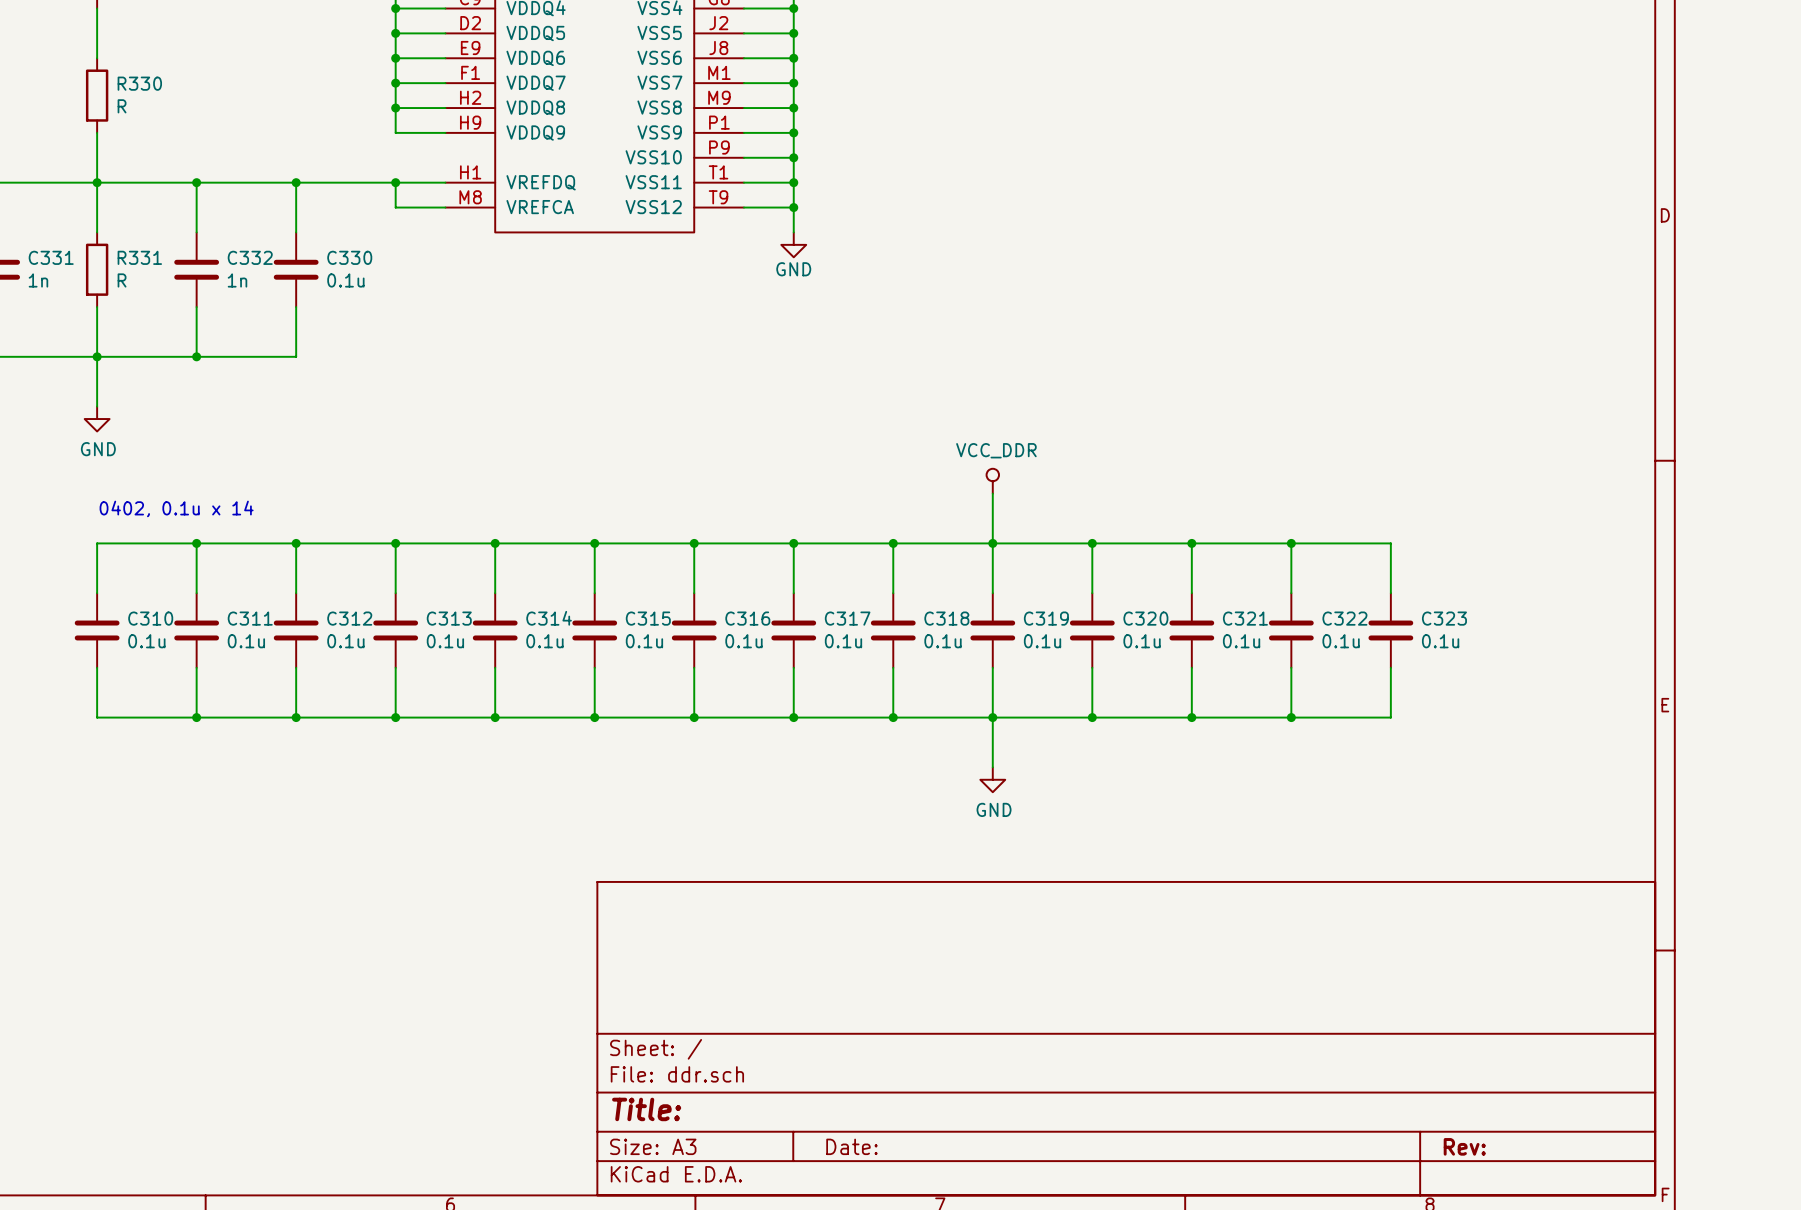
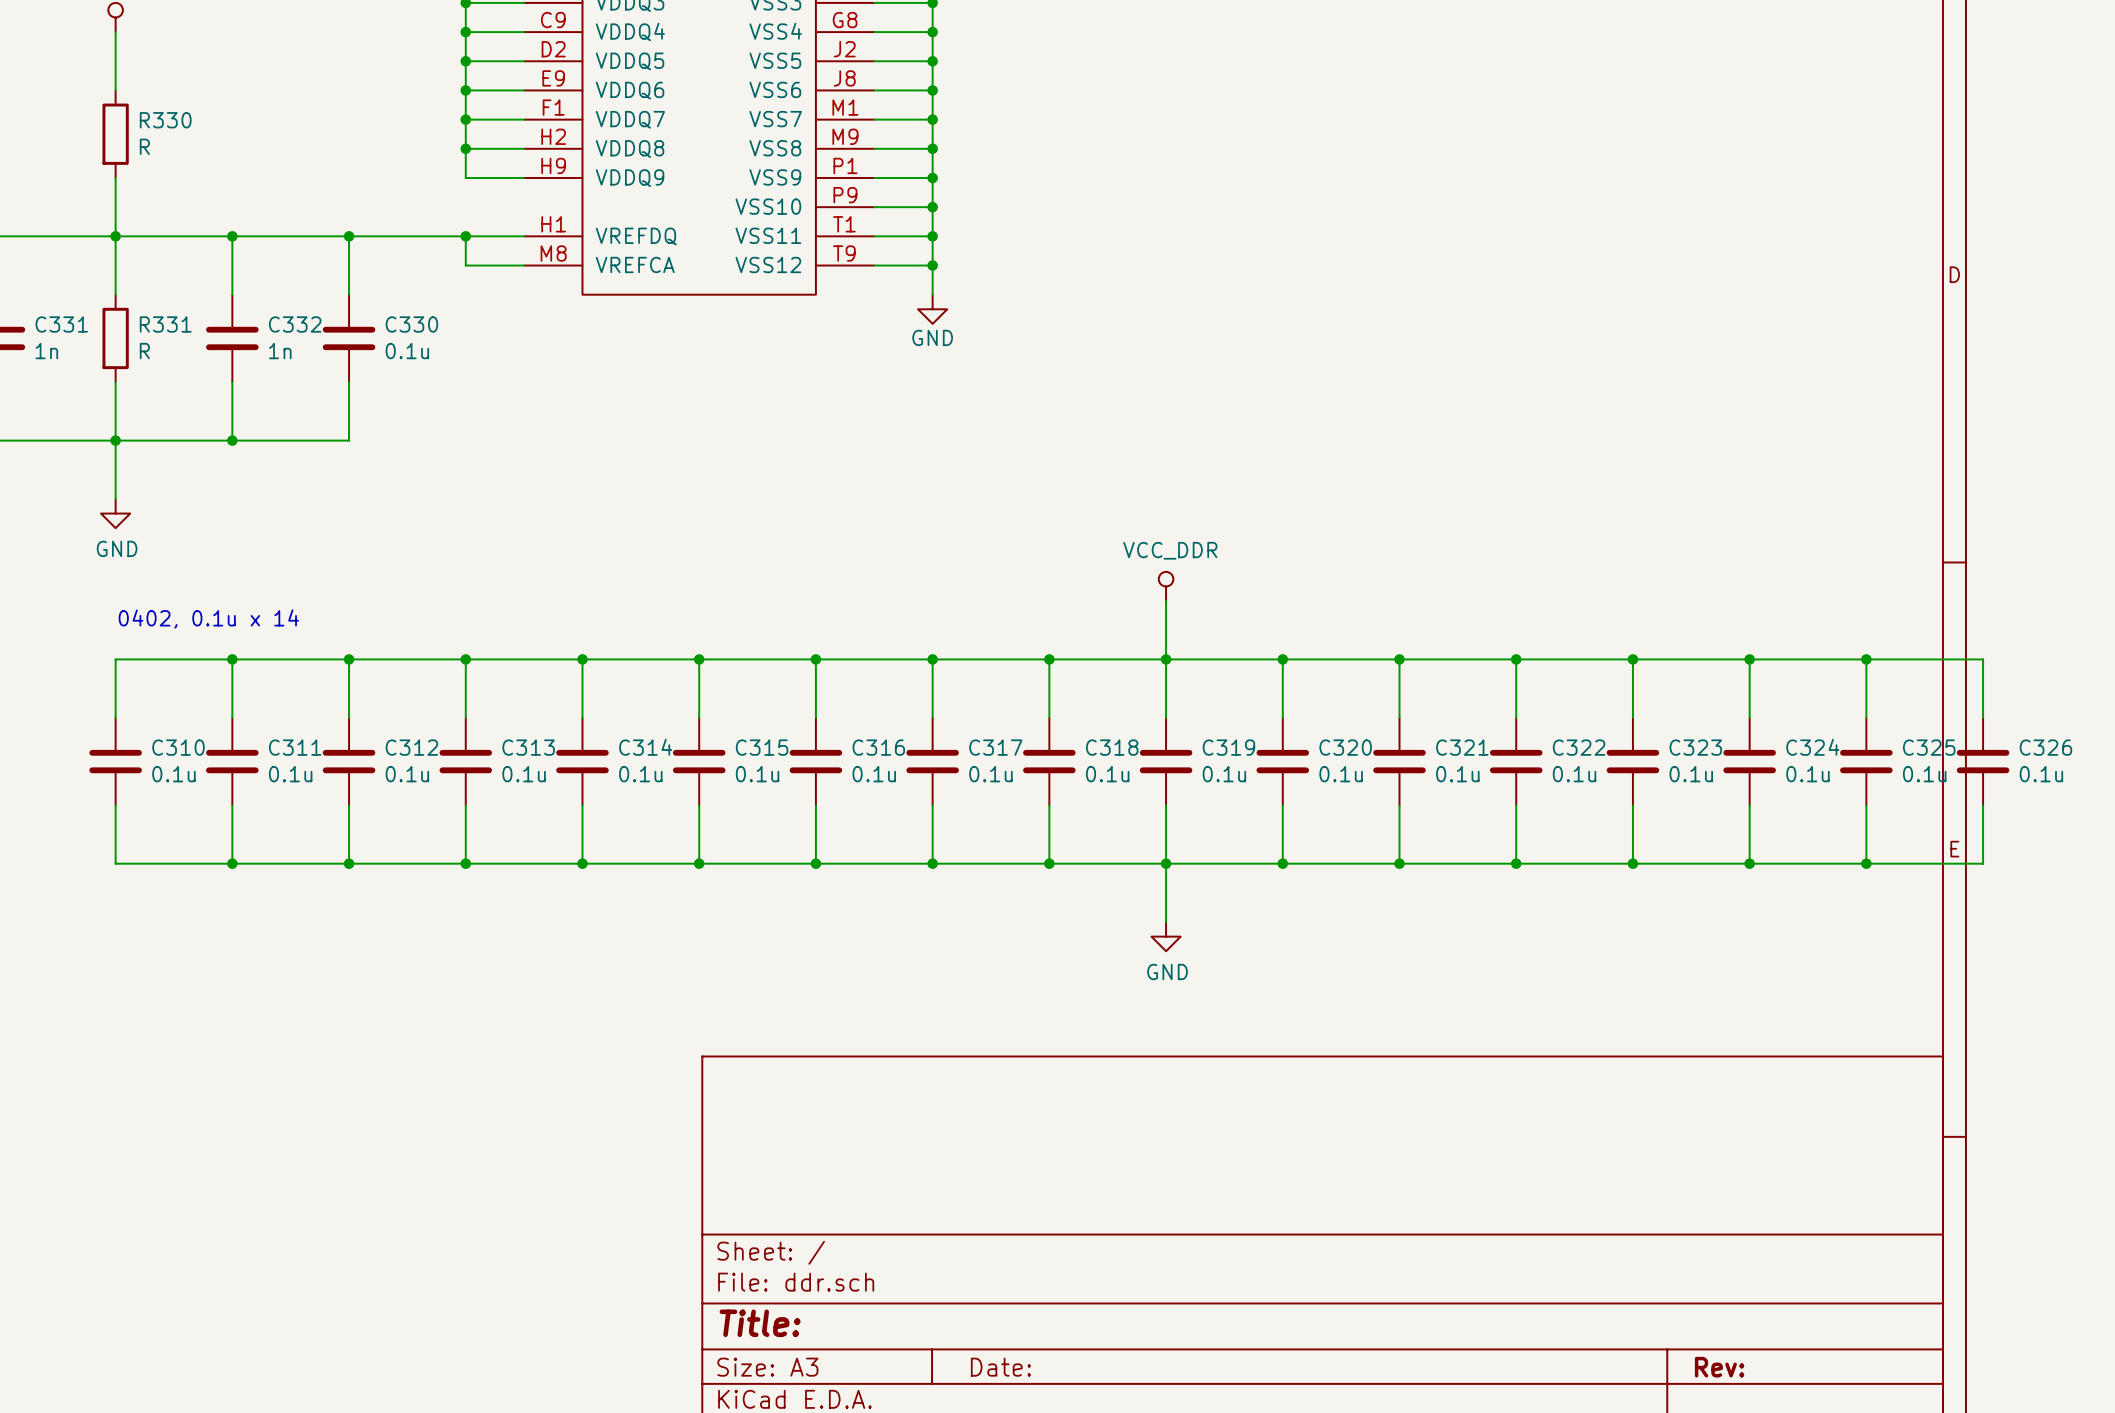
wire: none -> (1632, 659) (1983, 659) (1983, 717)
junction: none -> (1632, 659)
wire: none -> (1749, 659) (1749, 717)
junction: none -> (1749, 659)
wire: none -> (1866, 659) (1866, 717)
junction: none -> (1866, 659)
C324: none -> 0.1u (1749, 761)
C325: none -> 0.1u (1866, 761)
C326: none -> 0.1u (1983, 761)
wire: none -> (1749, 805) (1749, 863)
wire: none -> (1866, 805) (1866, 863)
wire: none -> (1983, 805) (1983, 863) (1632, 863)
junction: none -> (1632, 863)
junction: none -> (1749, 863)
junction: none -> (1866, 863)

